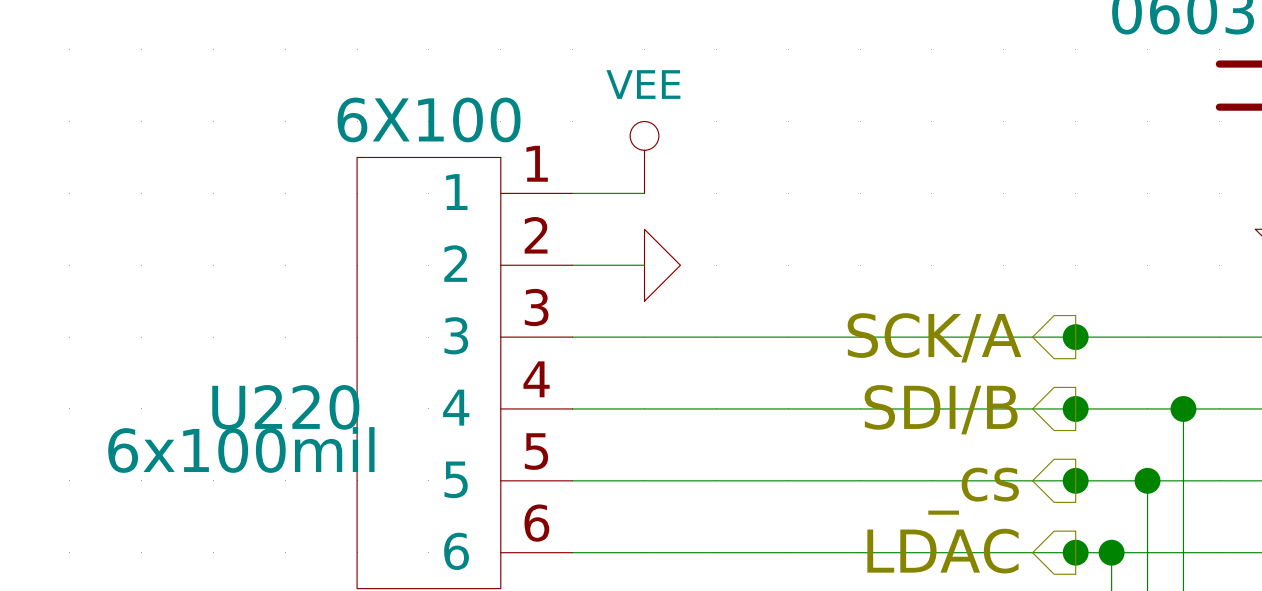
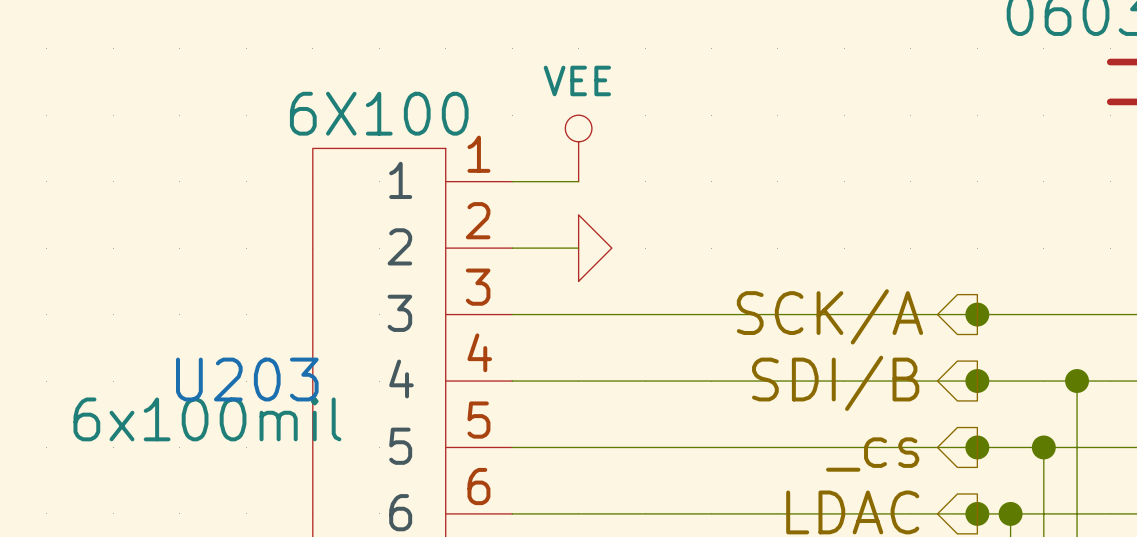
U220 name: U220 (285, 407) -> U203 (247, 379)

